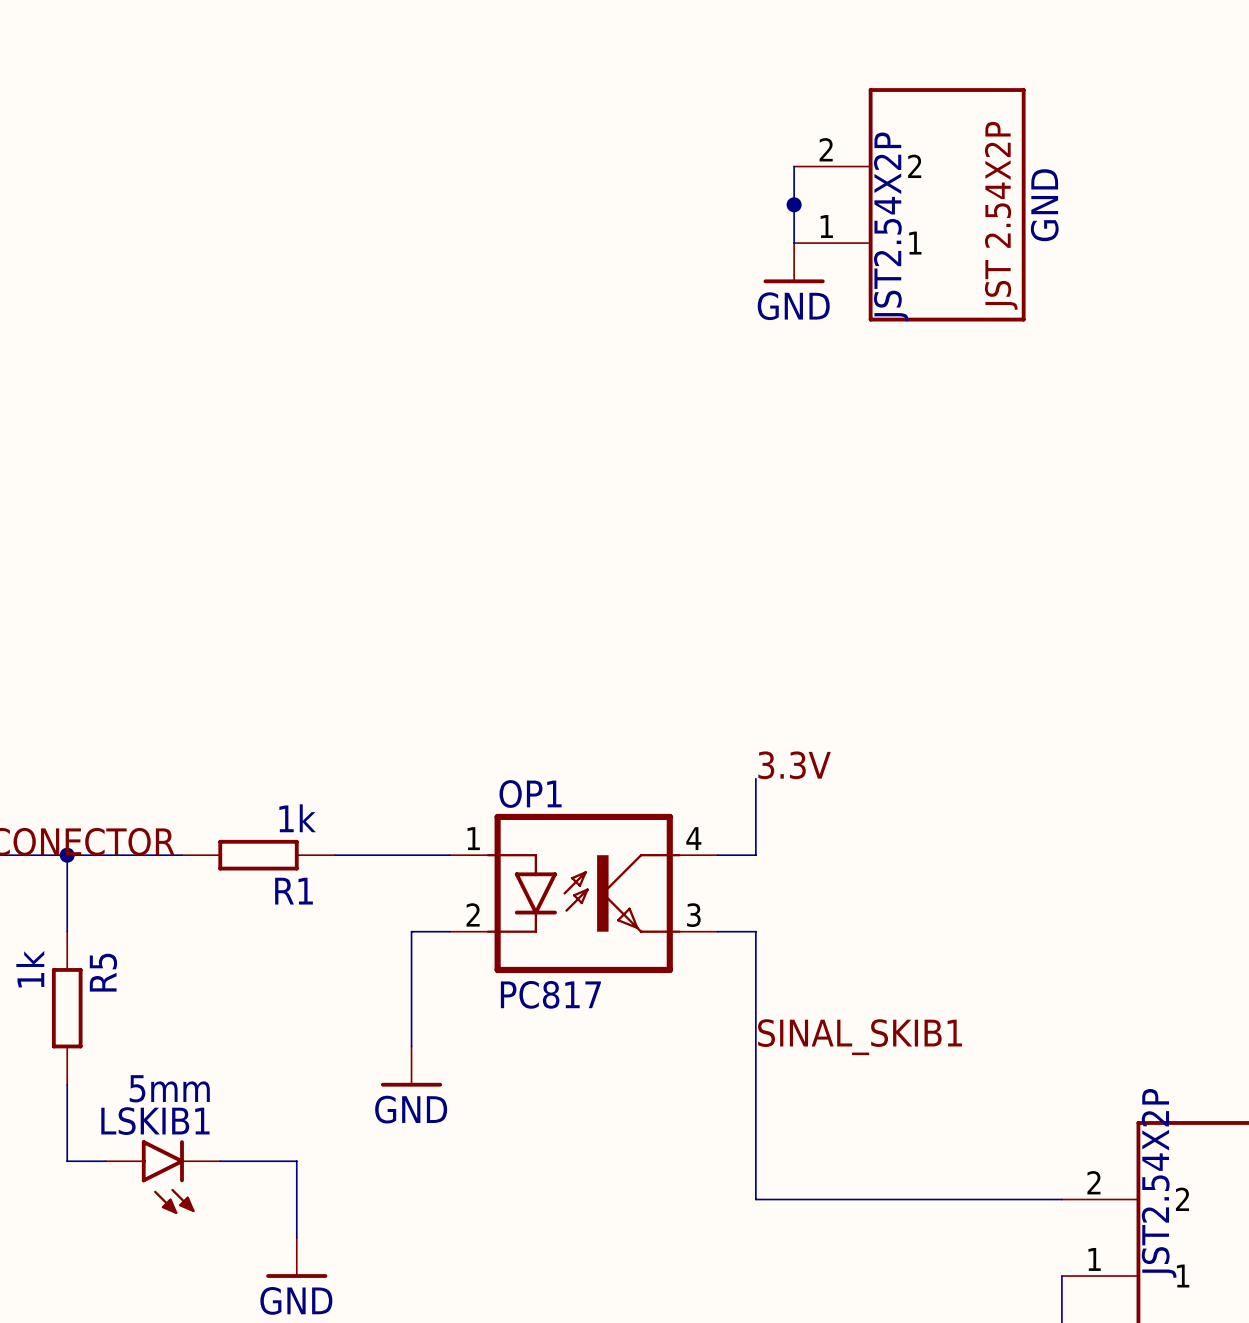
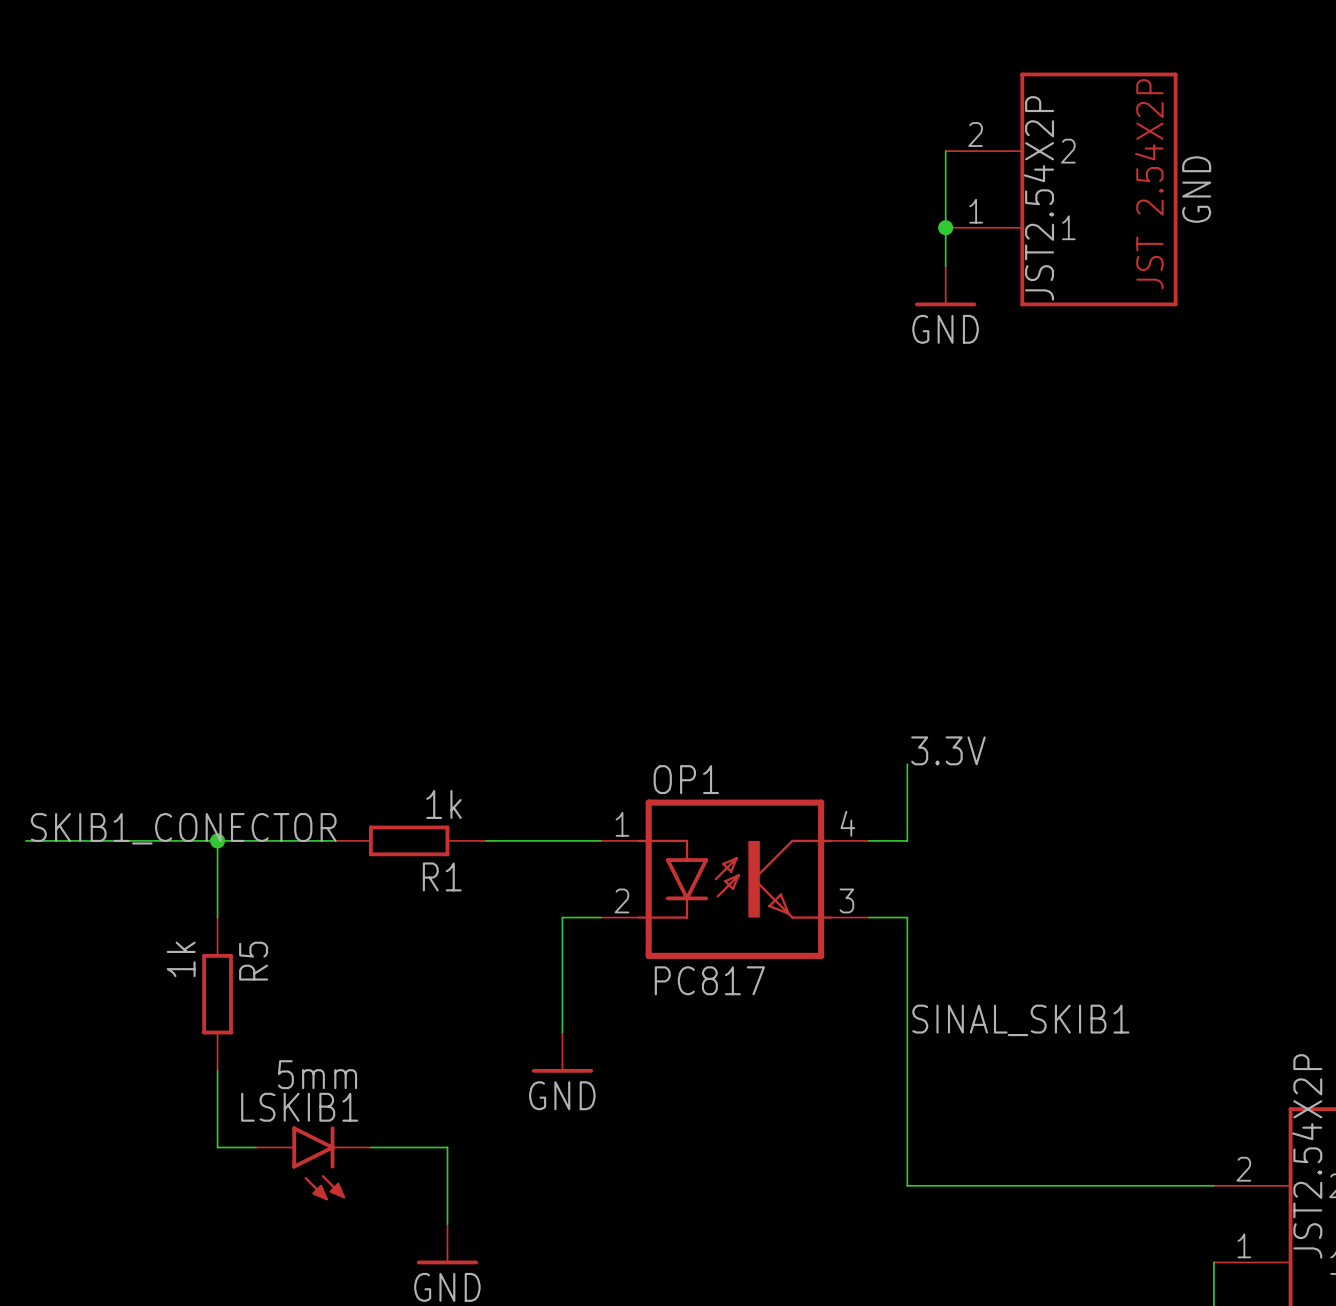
junction position: (794, 204) -> (945, 227)
power symbol position: GND (794, 263) -> GND (945, 286)

